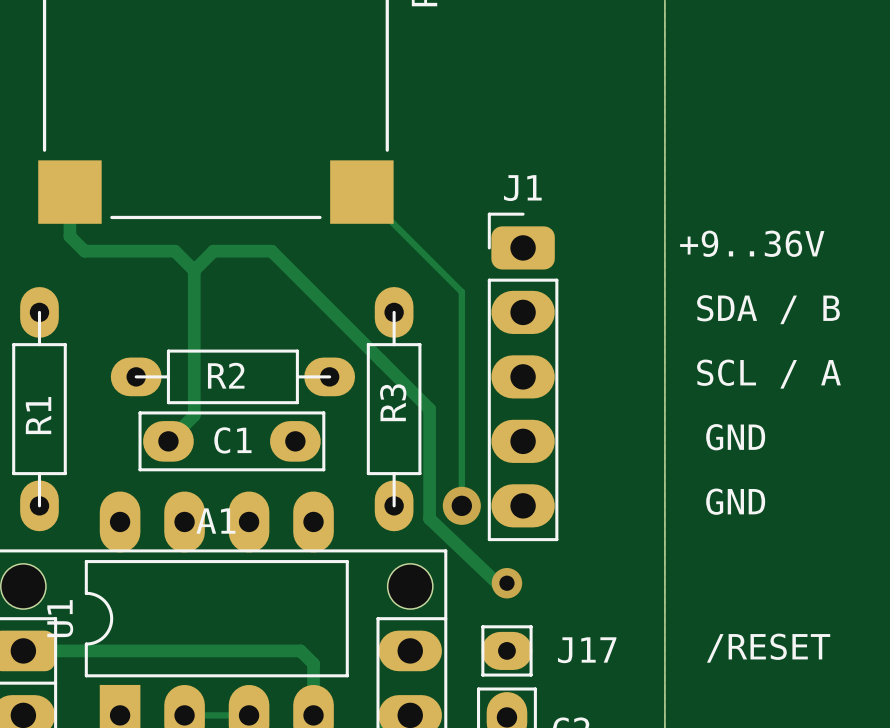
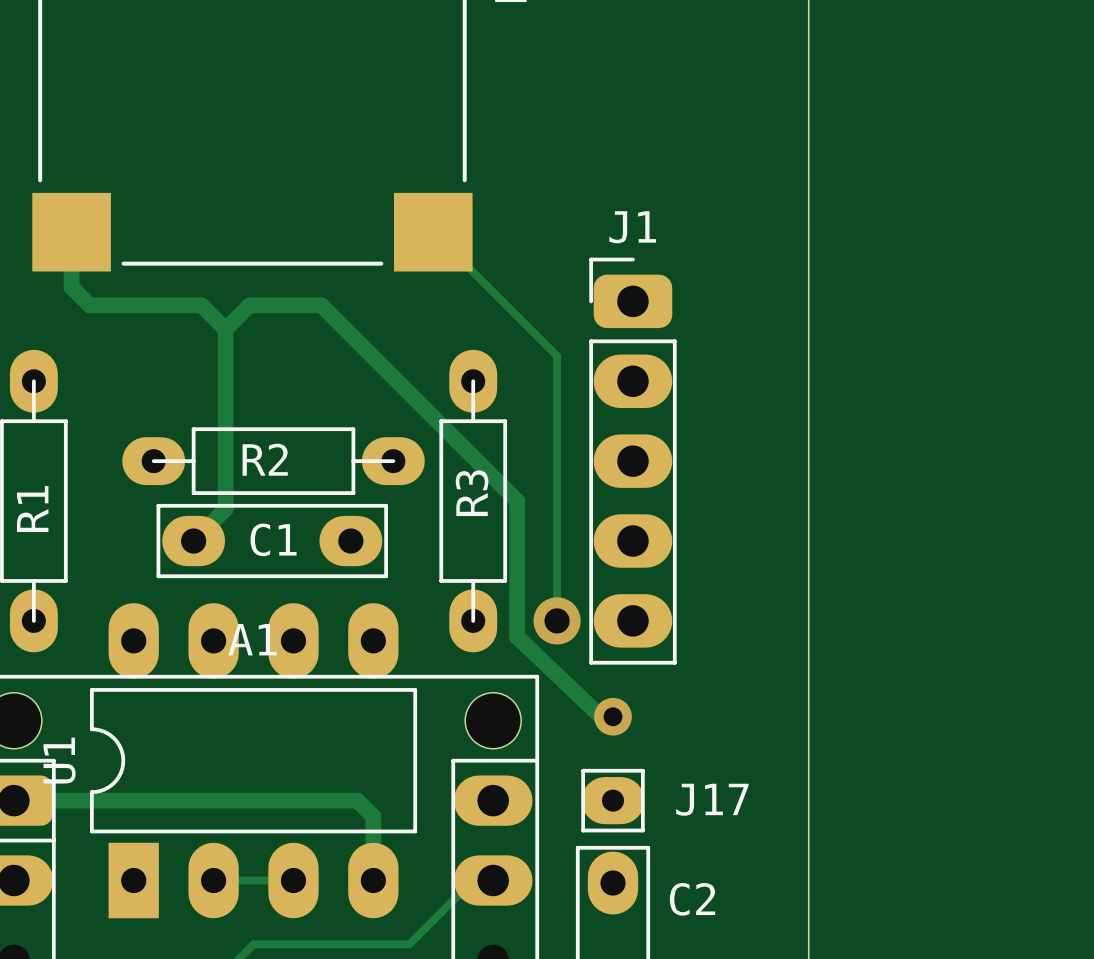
text: +9..36V (752, 243) -> none
text: SDA / B (768, 309) -> none
text: SCL / A (768, 374) -> none
text: GND (735, 437) -> none
text: GND (735, 501) -> none
text: /RESET (768, 648) -> none

